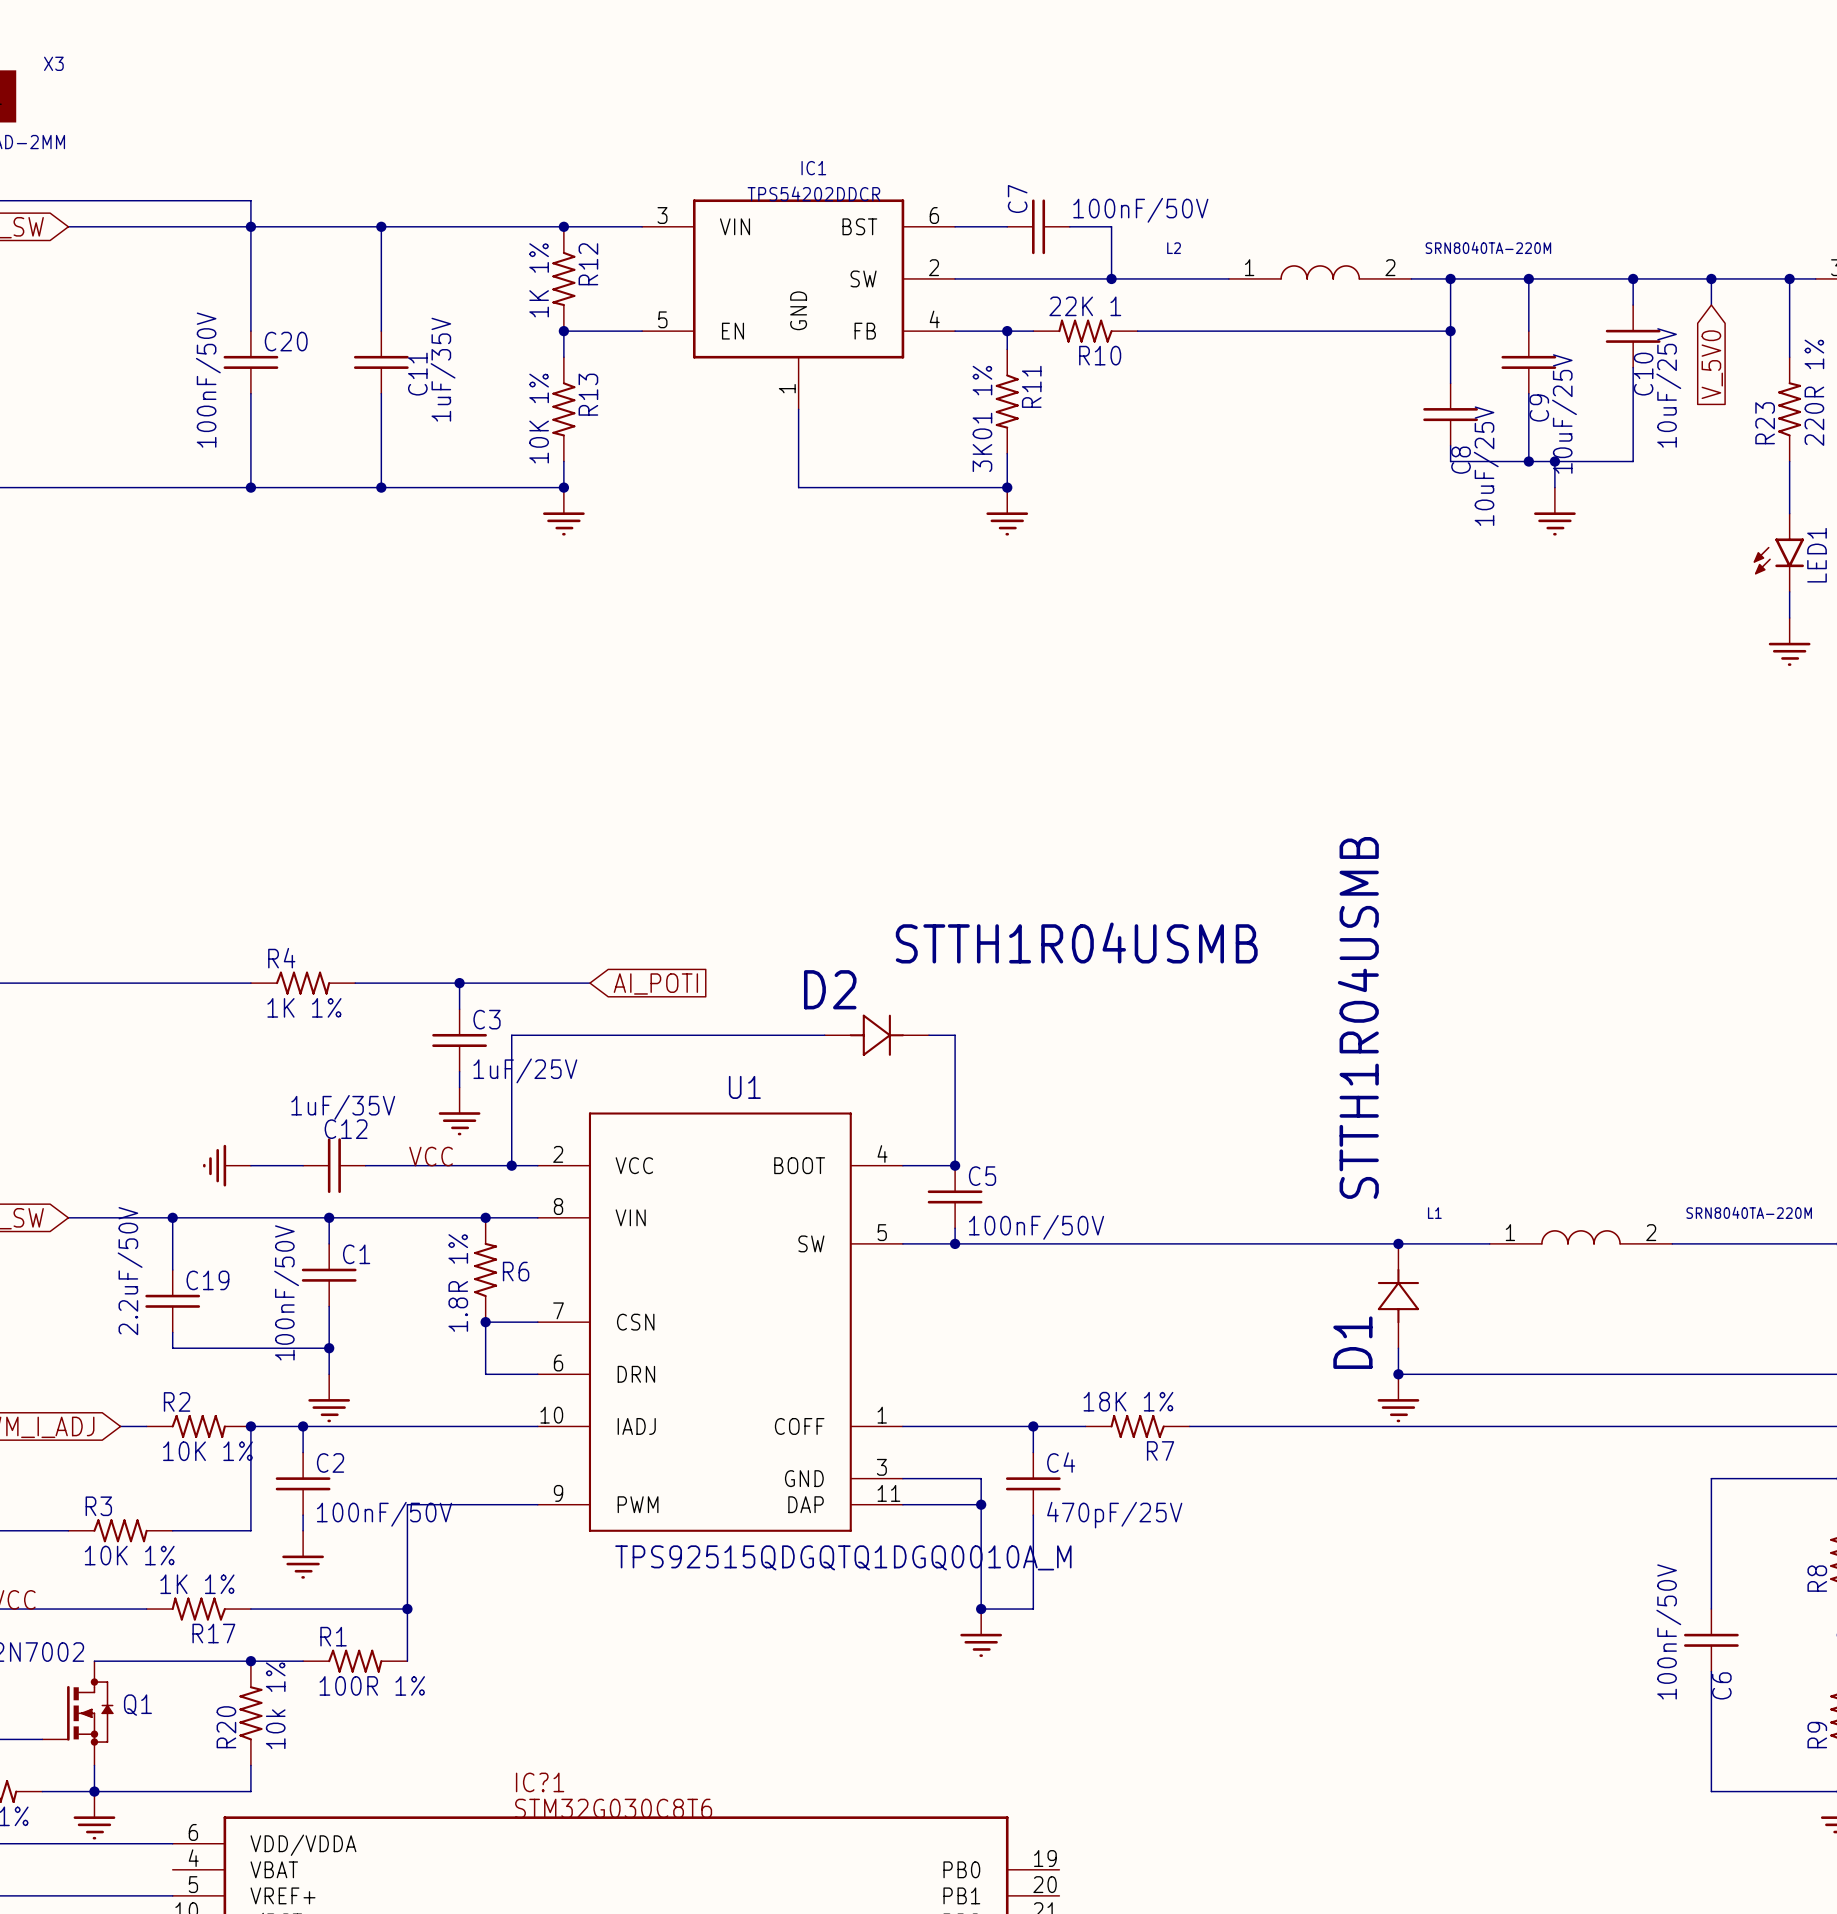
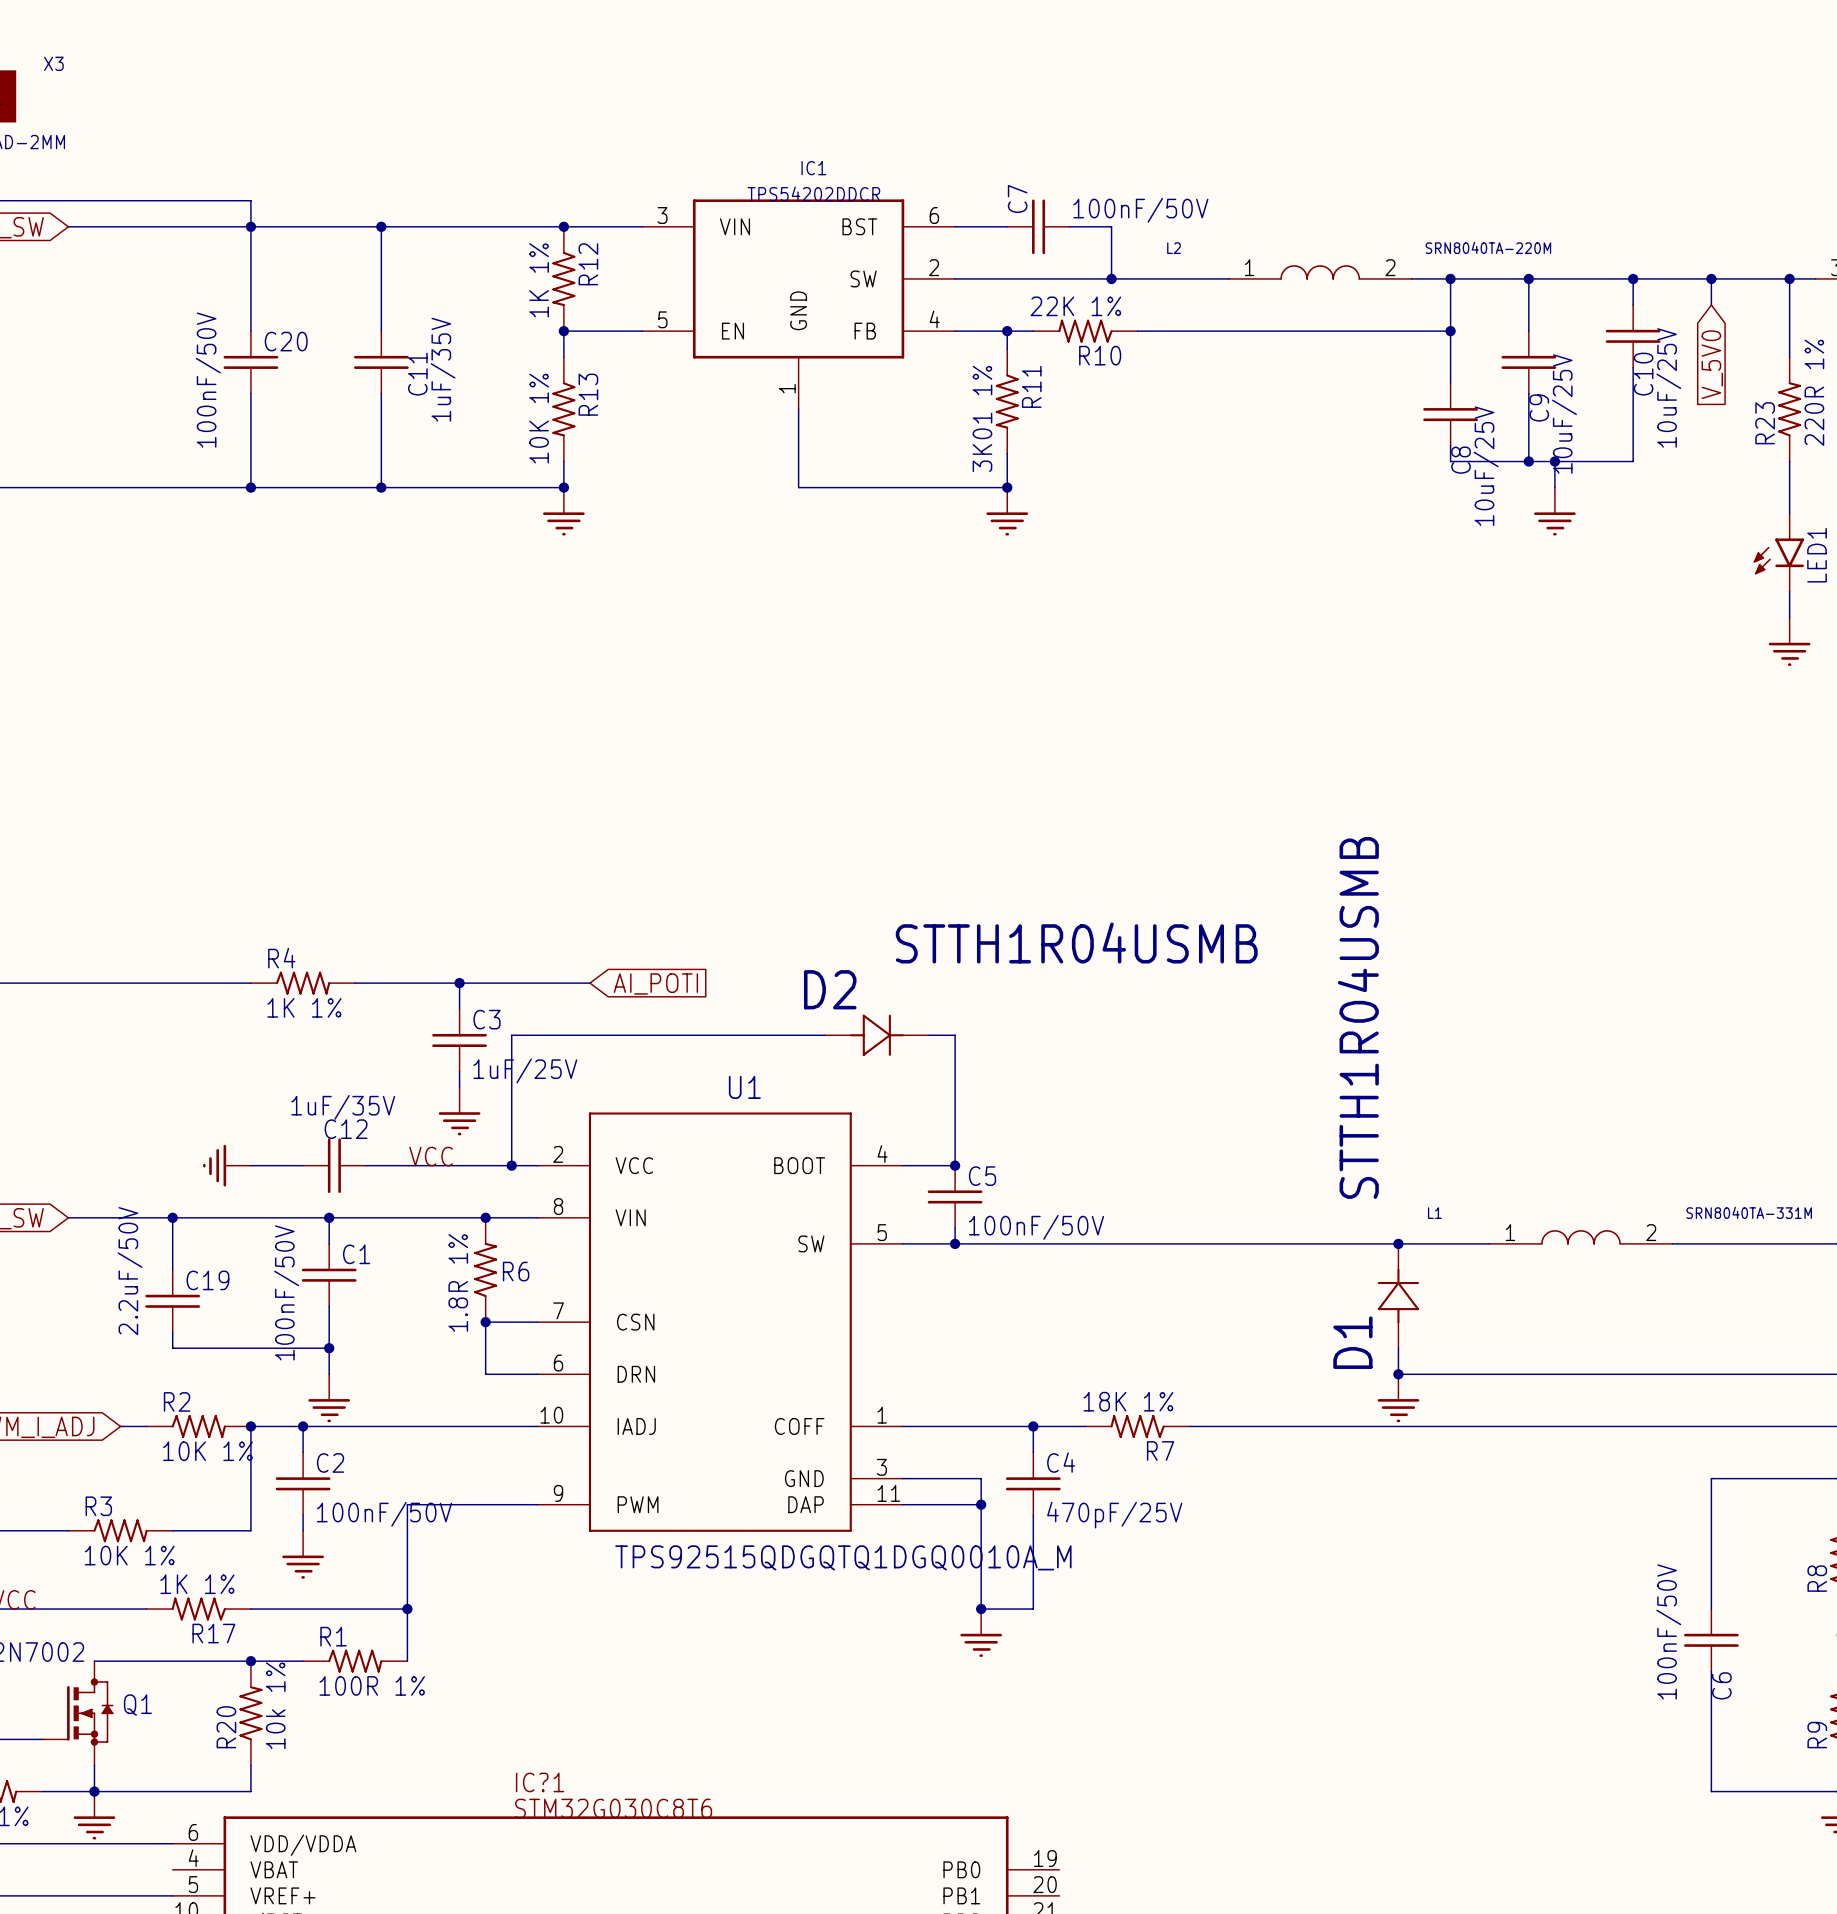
R10 value: 22K 1 (1085, 306) -> 22K 1% (1075, 306)
L1 value: SRN8040TA-220M (1749, 1212) -> SRN8040TA-331M (1749, 1212)

